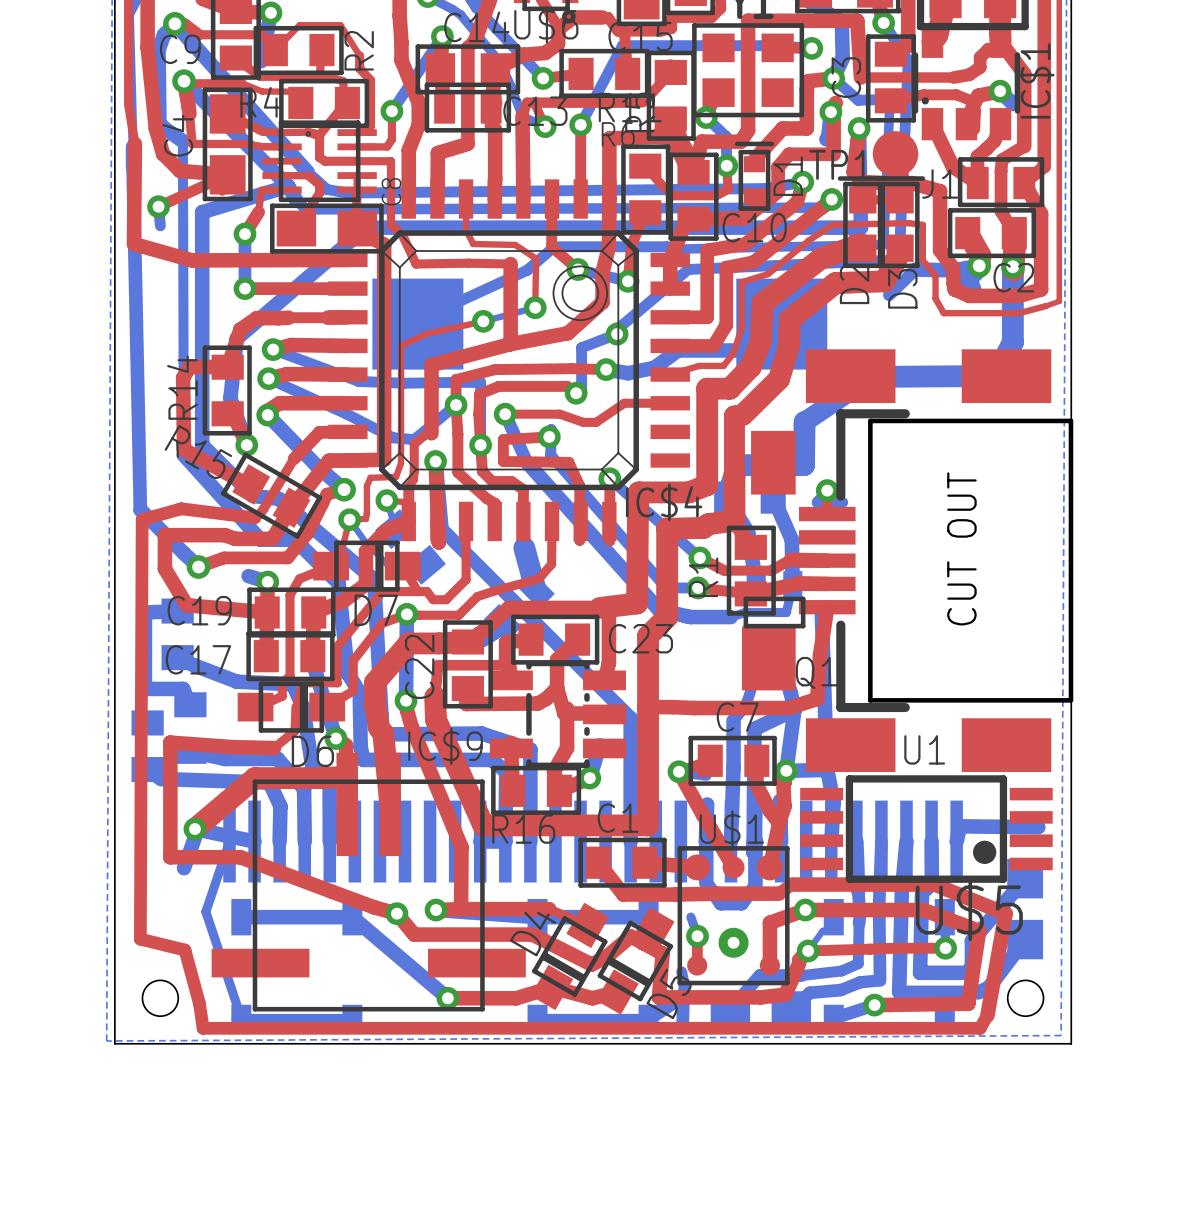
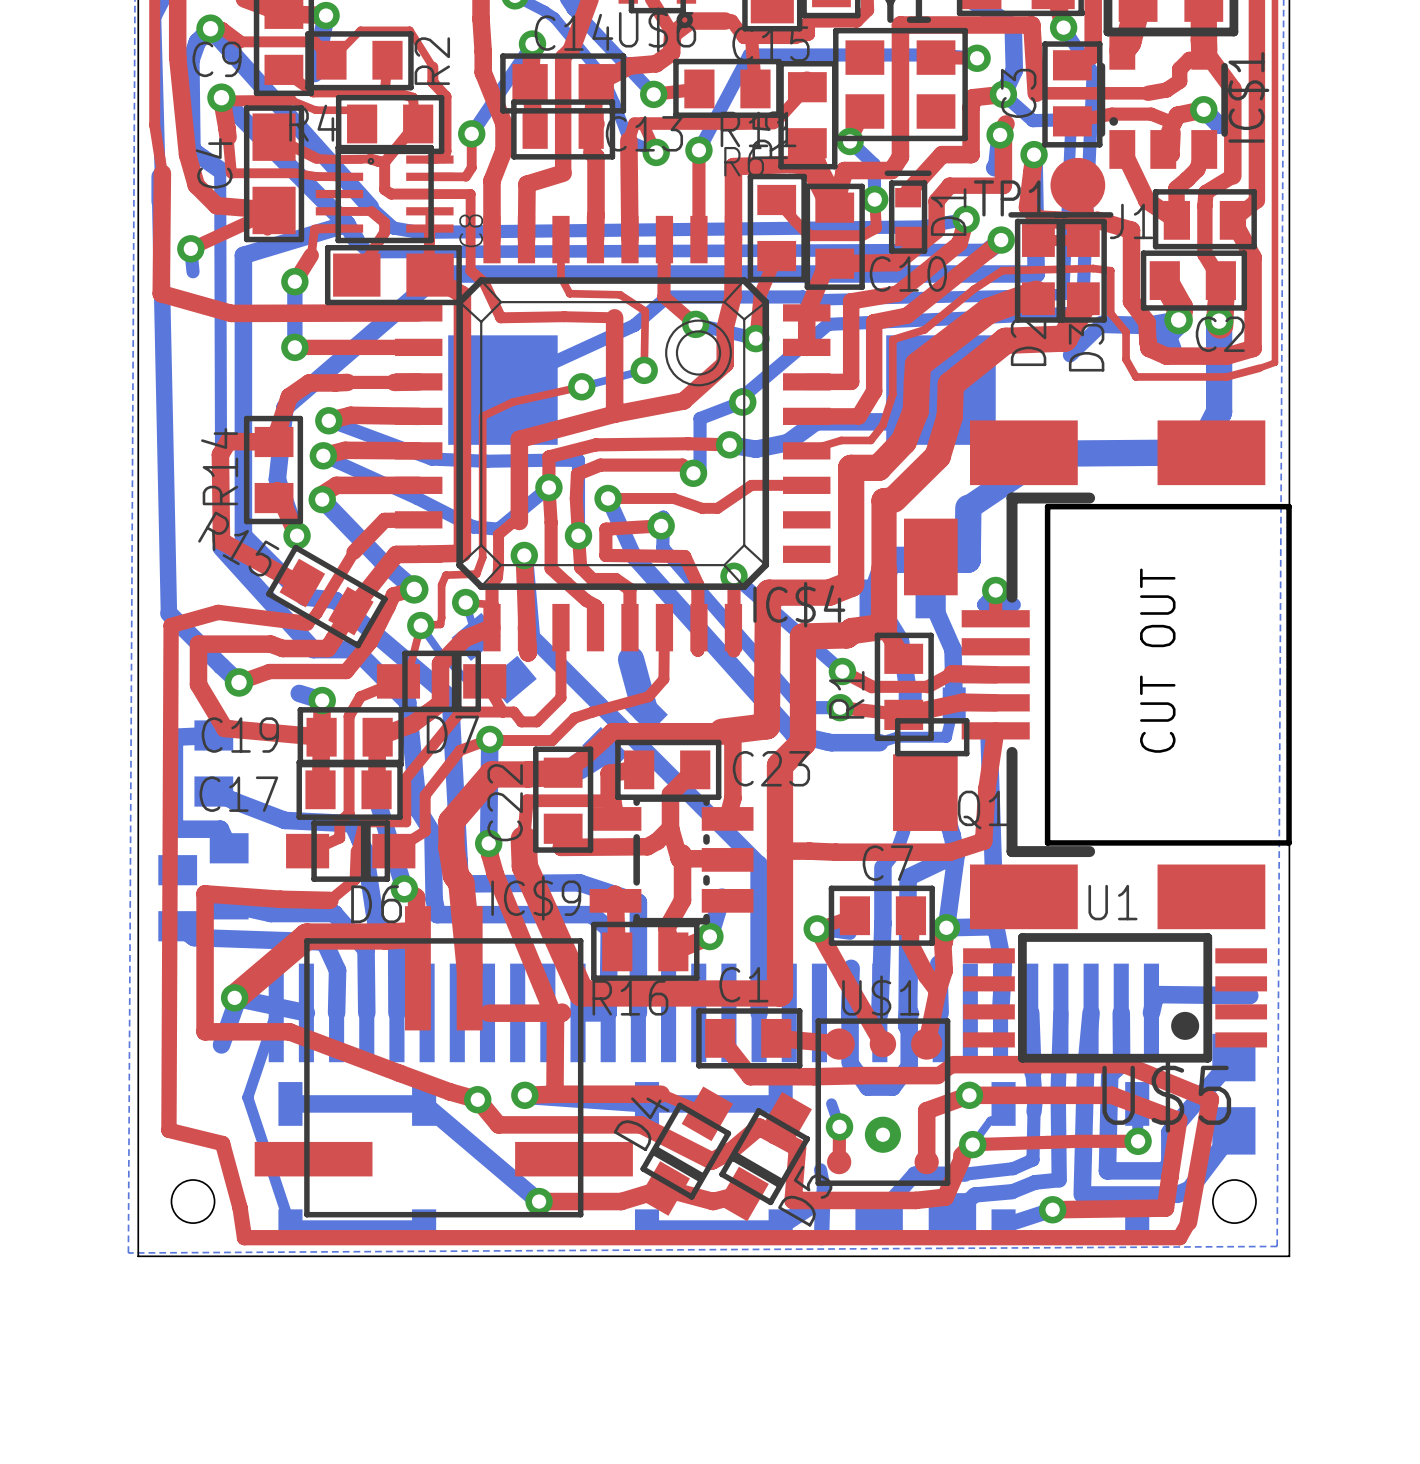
top track: none -> (562, 1012) (488, 1013)

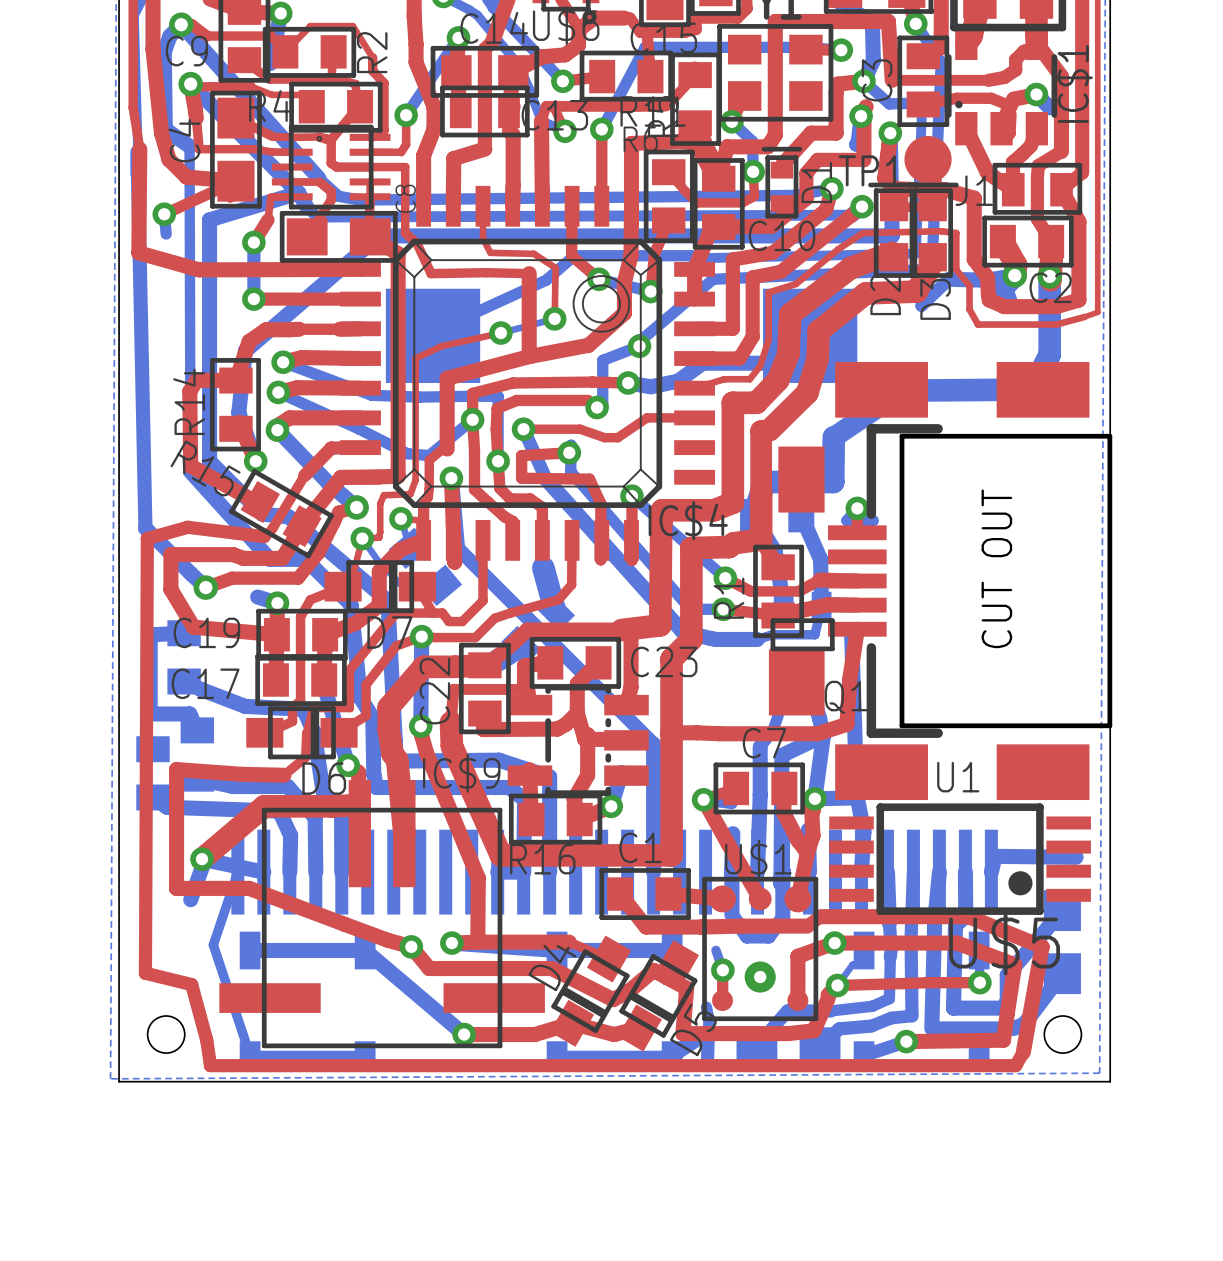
top track: (562, 1012) (488, 1013) -> none

